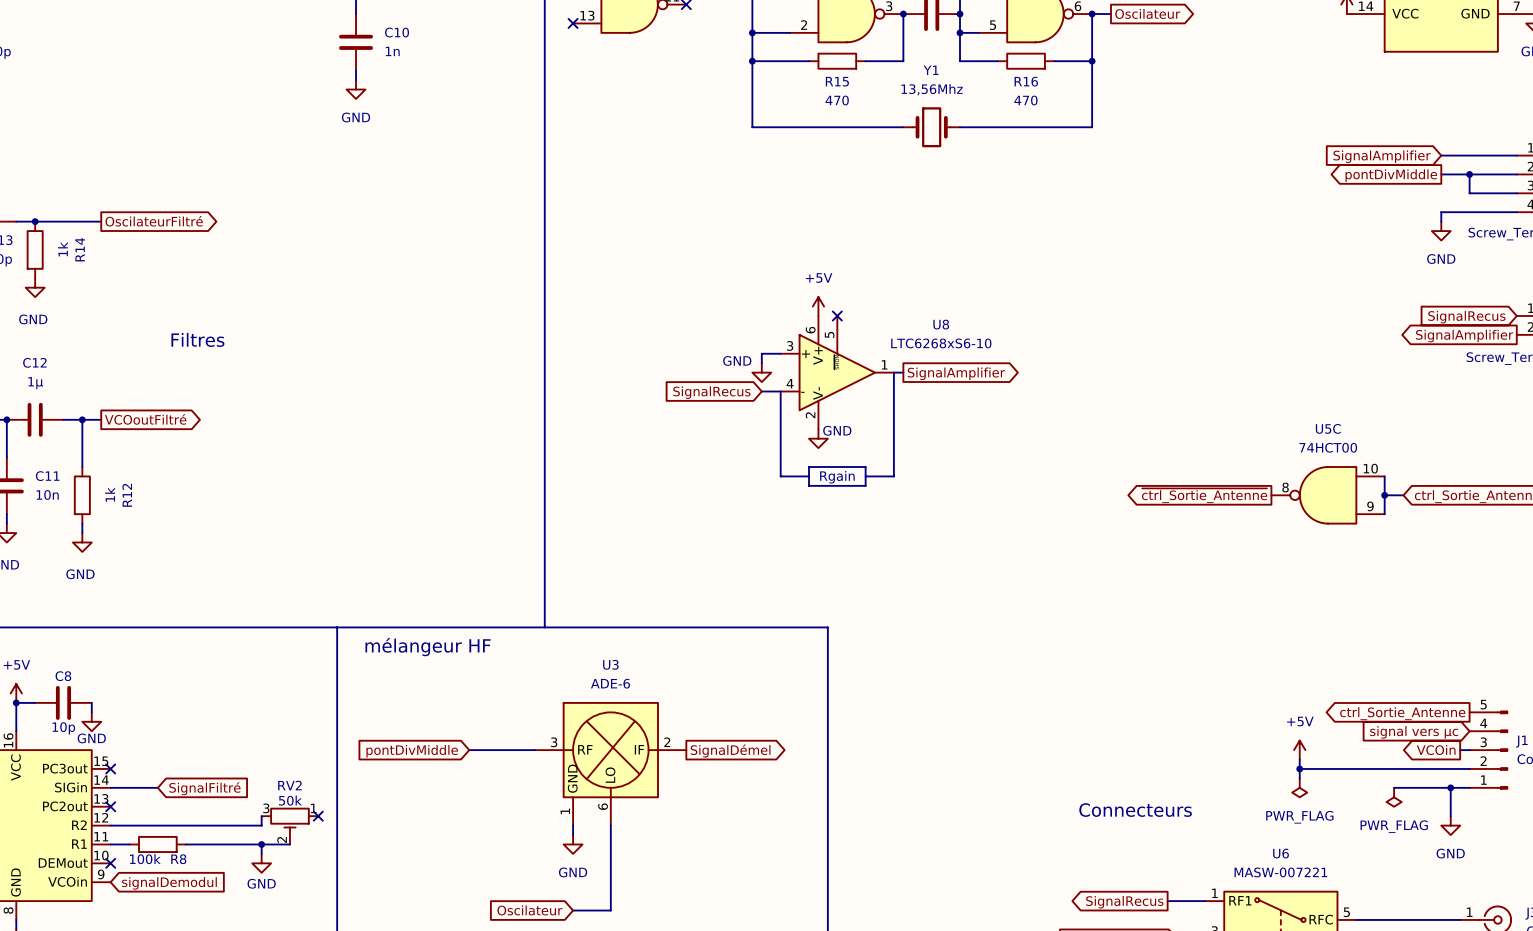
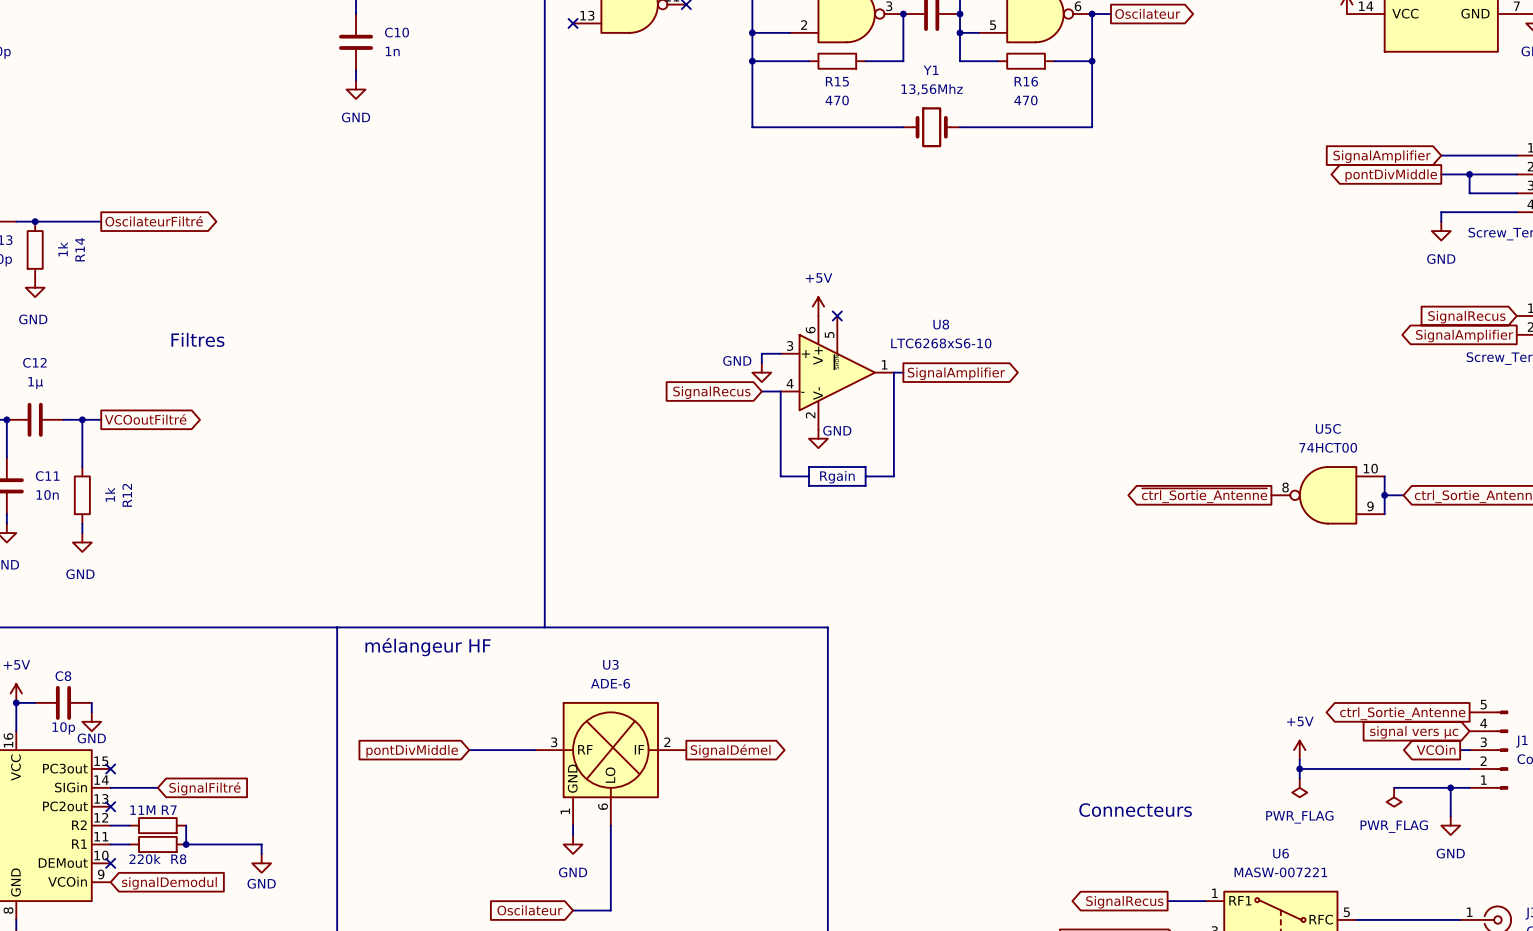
wire: (261, 816) (261, 825) (129, 825) -> none
no-connect mark: (318, 816) -> none
R7: none -> 11M (157, 825)
wire: none -> (186, 825) (186, 844)
RV2: 50k (289, 826) -> none
junction: none -> (186, 844)
wire: (261, 844) (289, 844) -> none
junction: (261, 844) -> none
R8 value: 100k (145, 859) -> 220k (145, 859)

